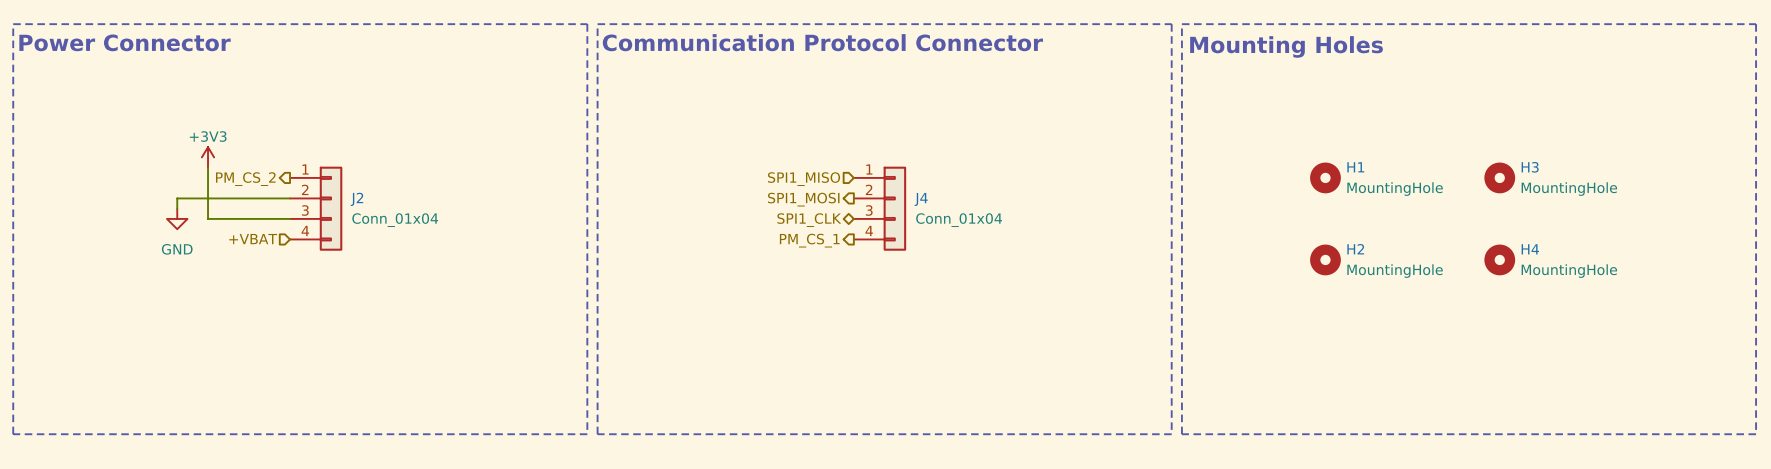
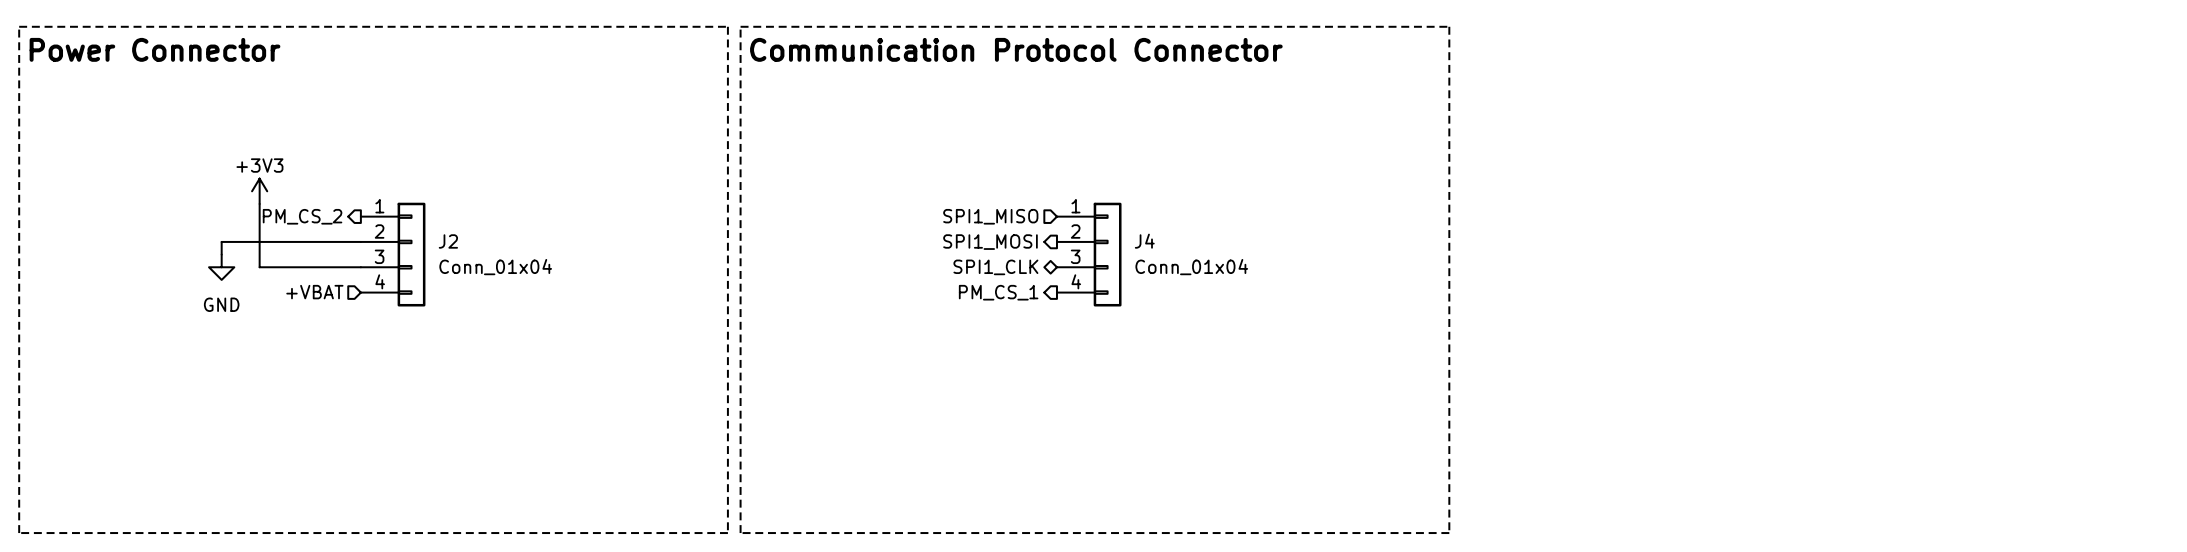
line: (1181, 24) (1756, 24) (1756, 434) (1181, 434) (1181, 24) -> none
text: Mounting Holes (1286, 46) -> none
H1: MountingHole (1325, 177) -> none
H3: MountingHole (1499, 177) -> none
H2: MountingHole (1325, 259) -> none
H4: MountingHole (1499, 259) -> none

